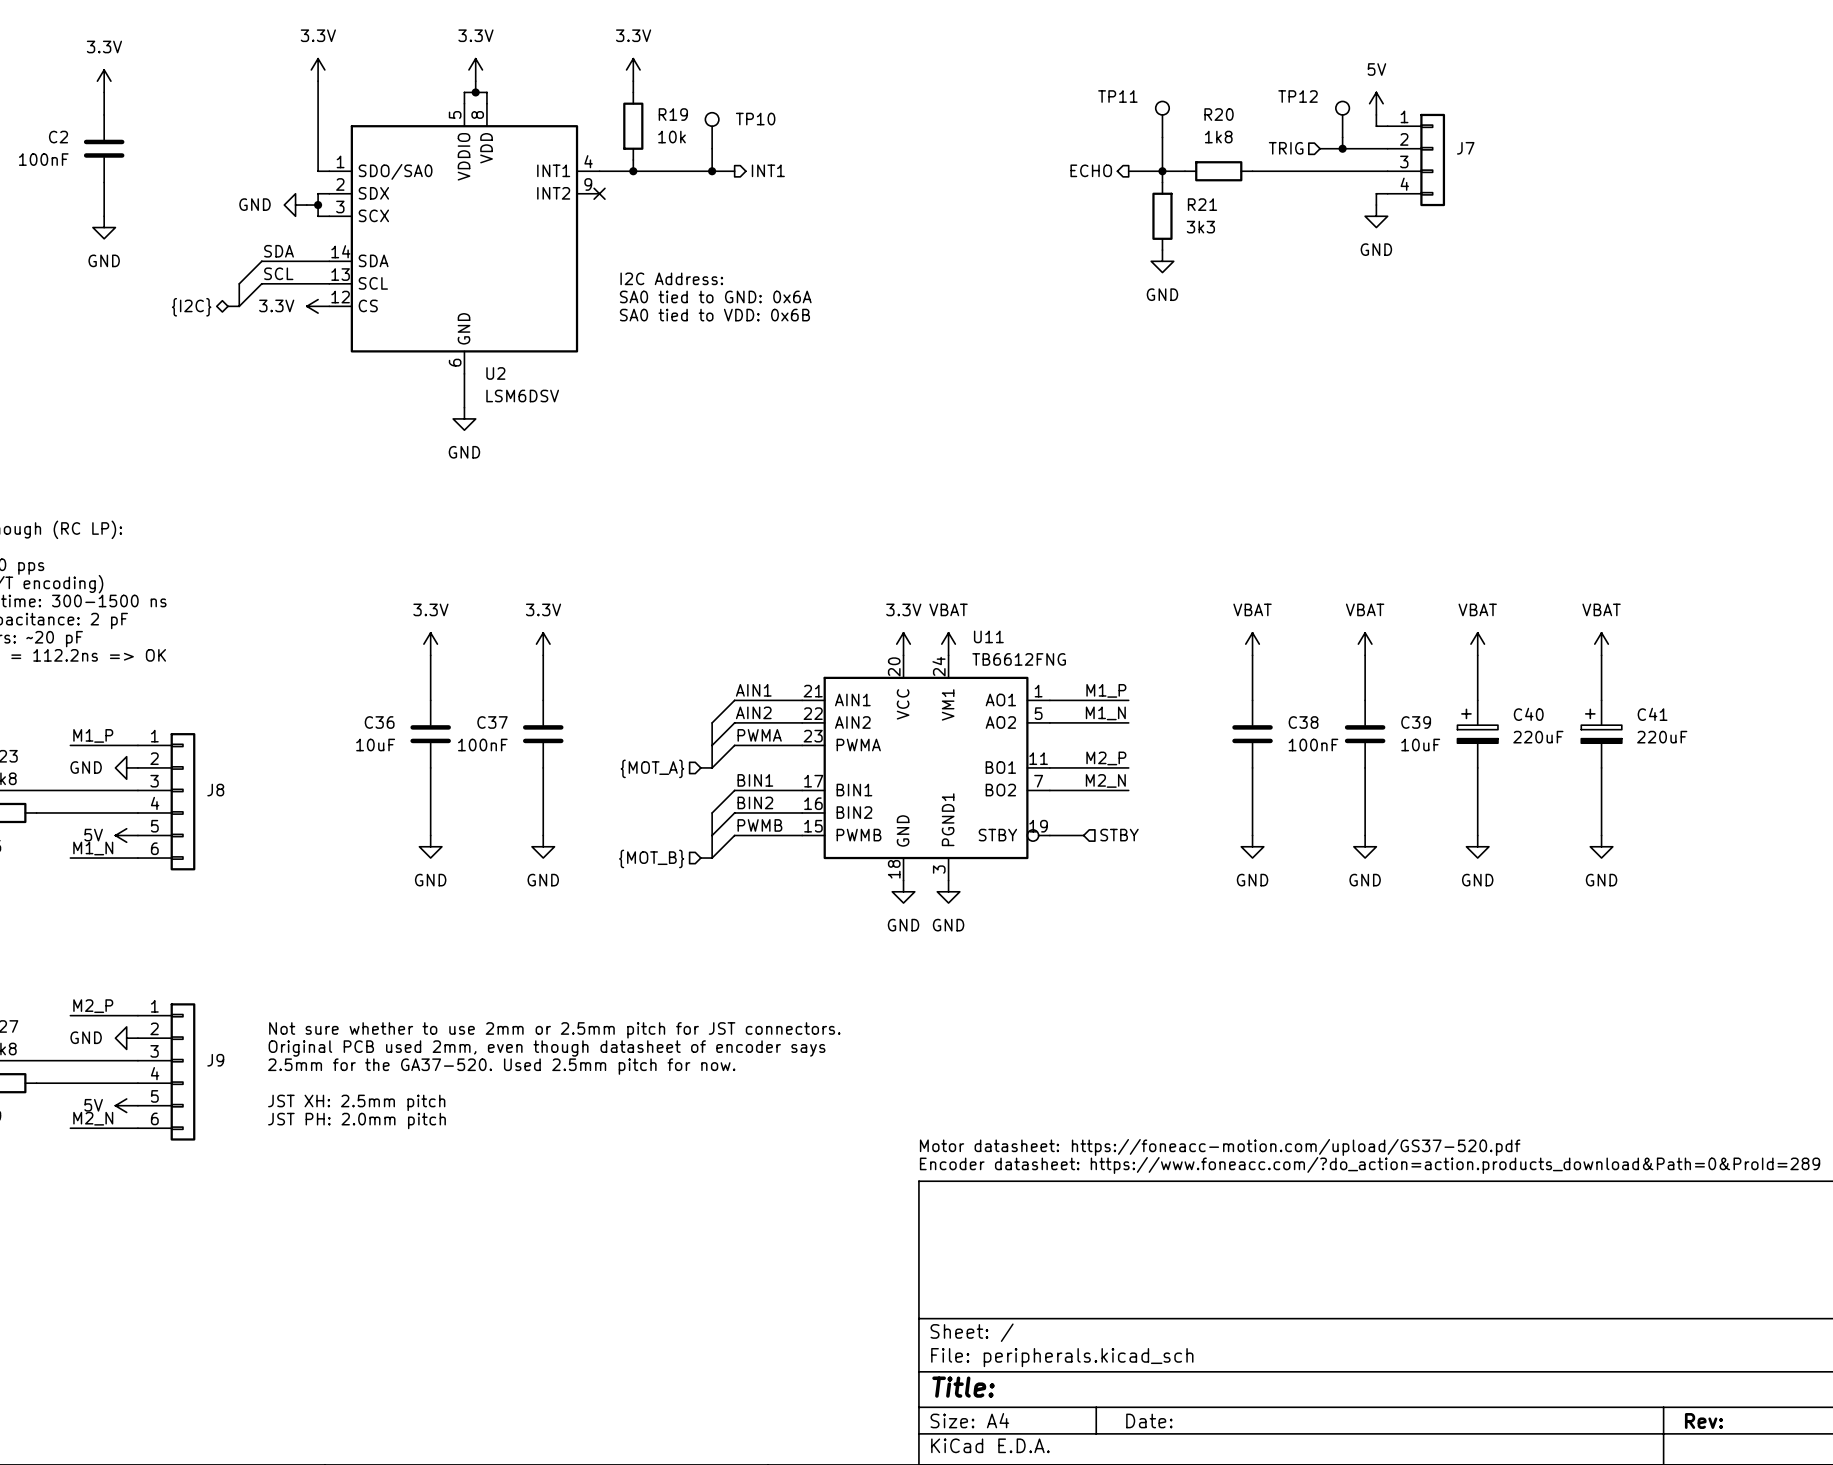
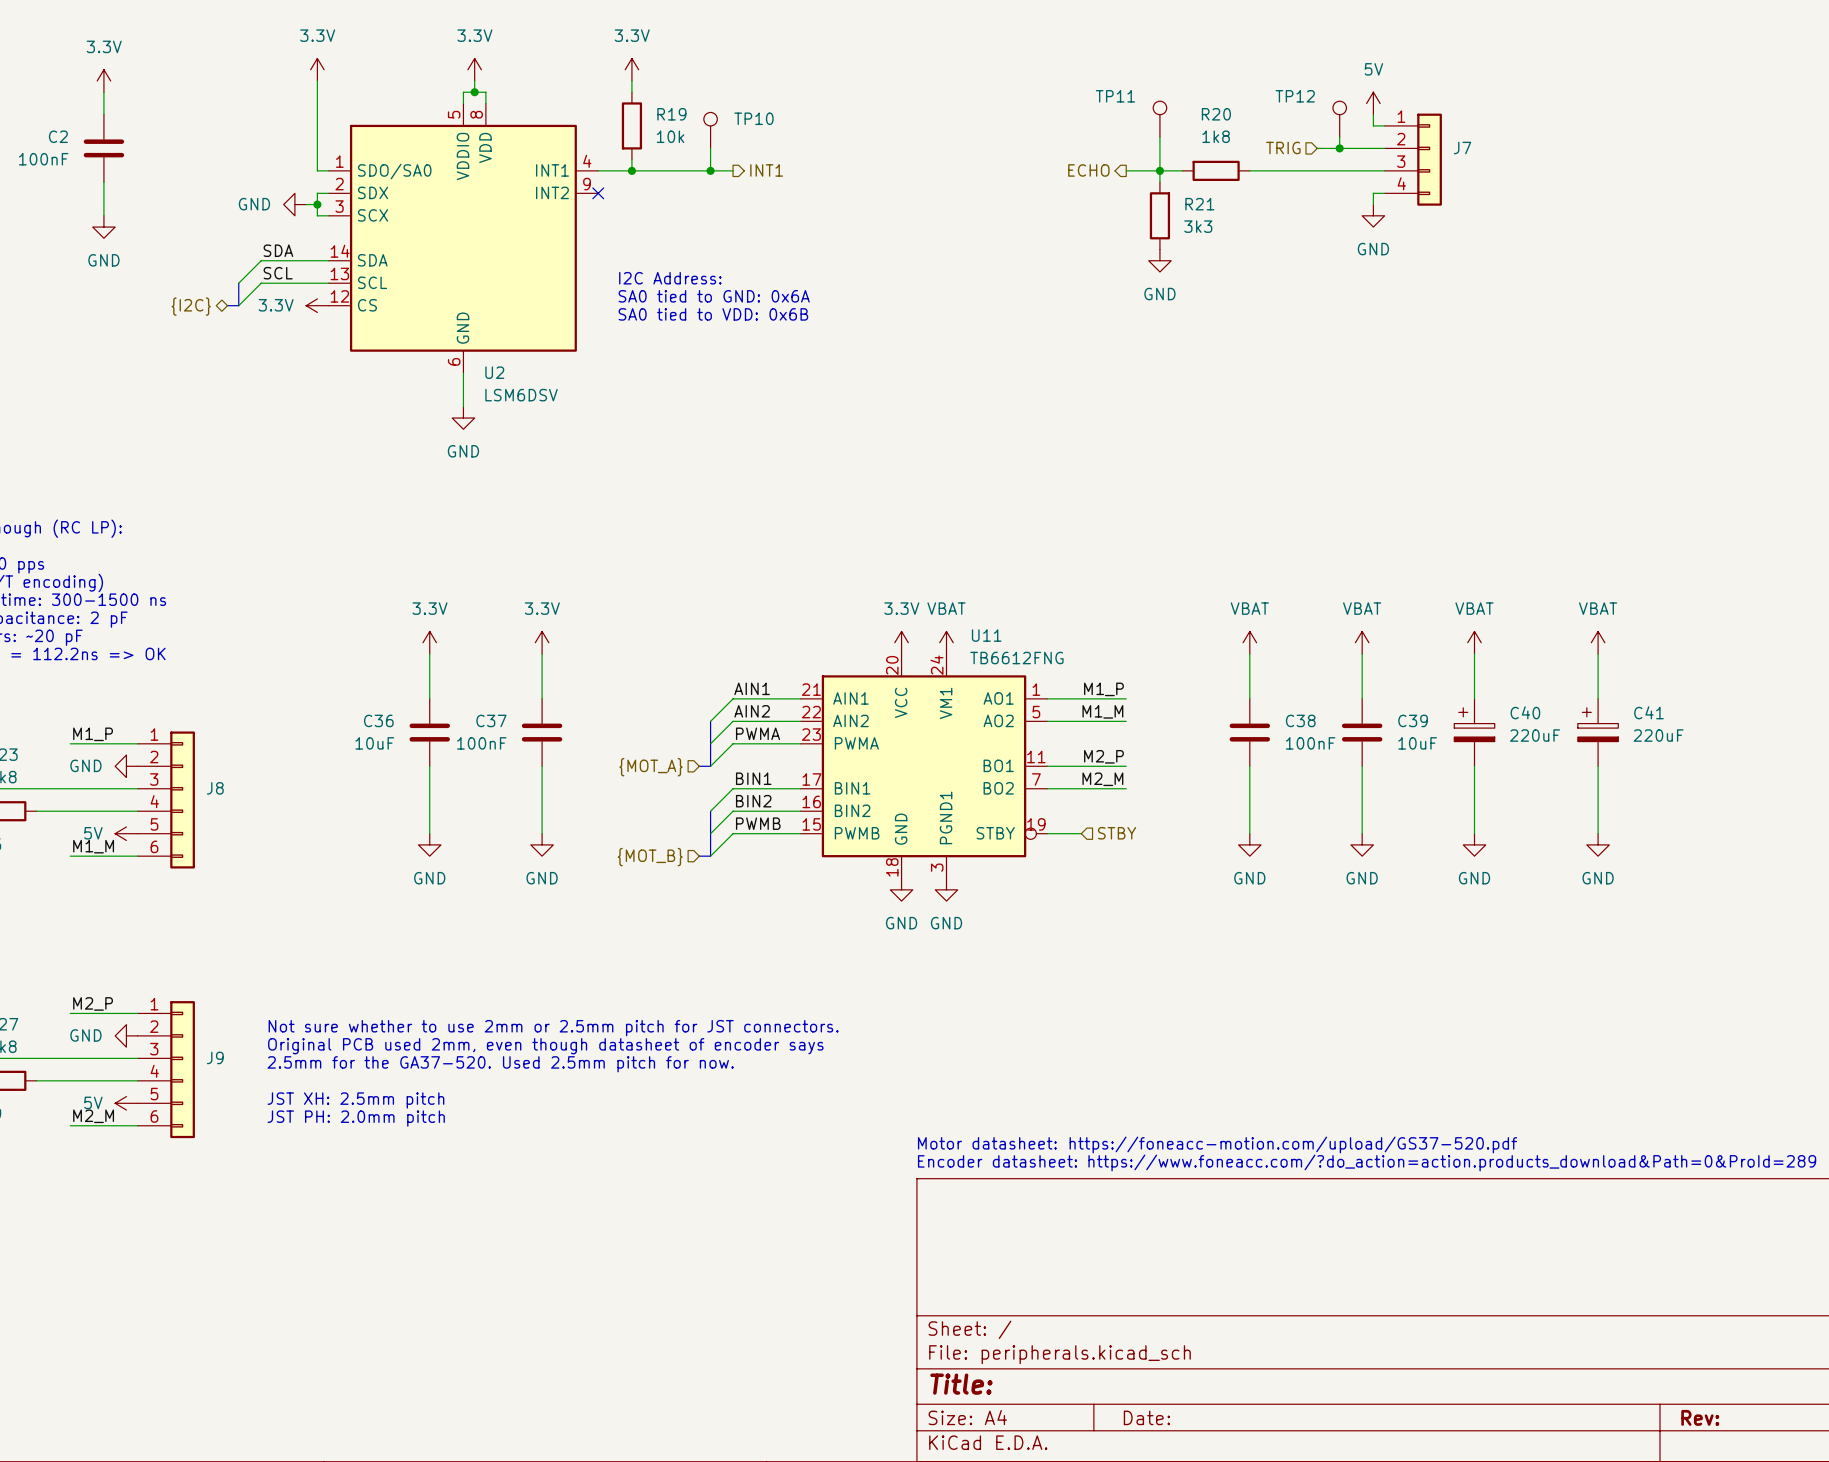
label: M1_N (1105, 713) -> M1_M (1102, 711)
label: M2_N (1105, 780) -> M2_M (1102, 779)
label: M1_N (93, 848) -> M1_M (93, 846)
label: M2_N (93, 1118) -> M2_M (93, 1116)

